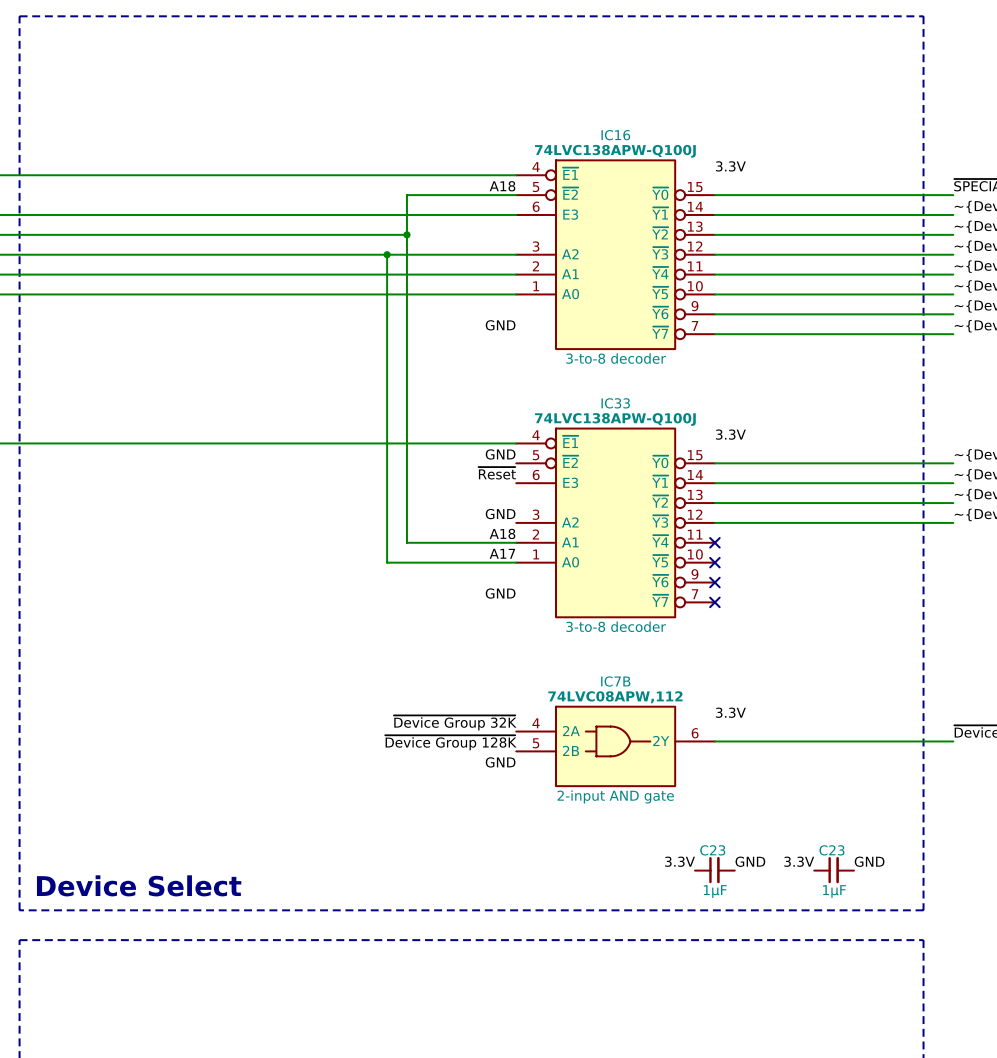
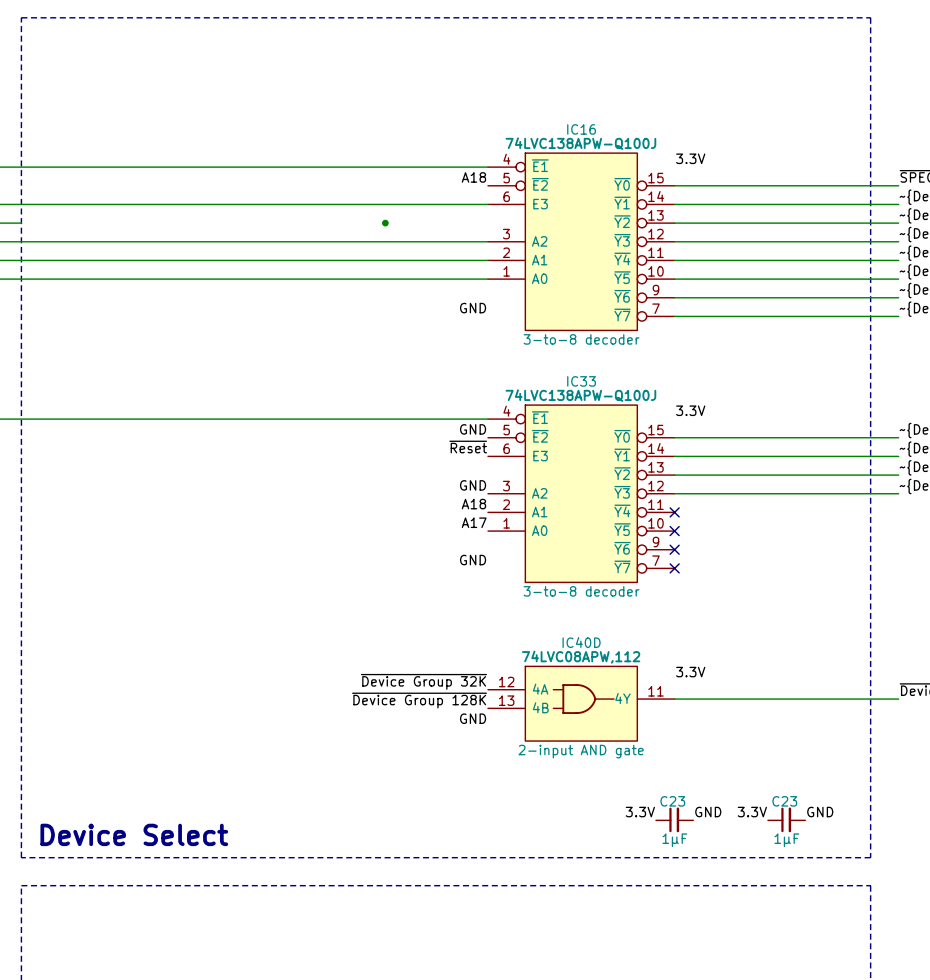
wire: (516, 195) (406, 195) (406, 542) (516, 542) -> none
wire: (19, 234) (406, 234) -> none
wire: (387, 254) (387, 562) (516, 562) -> none
junction: (387, 254) -> none
IC7B name: IC7B (615, 681) -> IC40D (581, 642)
IC7B pin number: 4 (536, 723) -> 12 (506, 682)
IC7B pin name: 2A (571, 731) -> 4A (540, 689)
IC7B pin number: 6 (695, 733) -> 11 (655, 691)
IC7B pin name: 2Y (661, 741) -> 4Y (622, 698)
IC7B pin number: 5 (536, 743) -> 13 (506, 700)
IC7B pin name: 2B (570, 750) -> 4B (540, 707)

